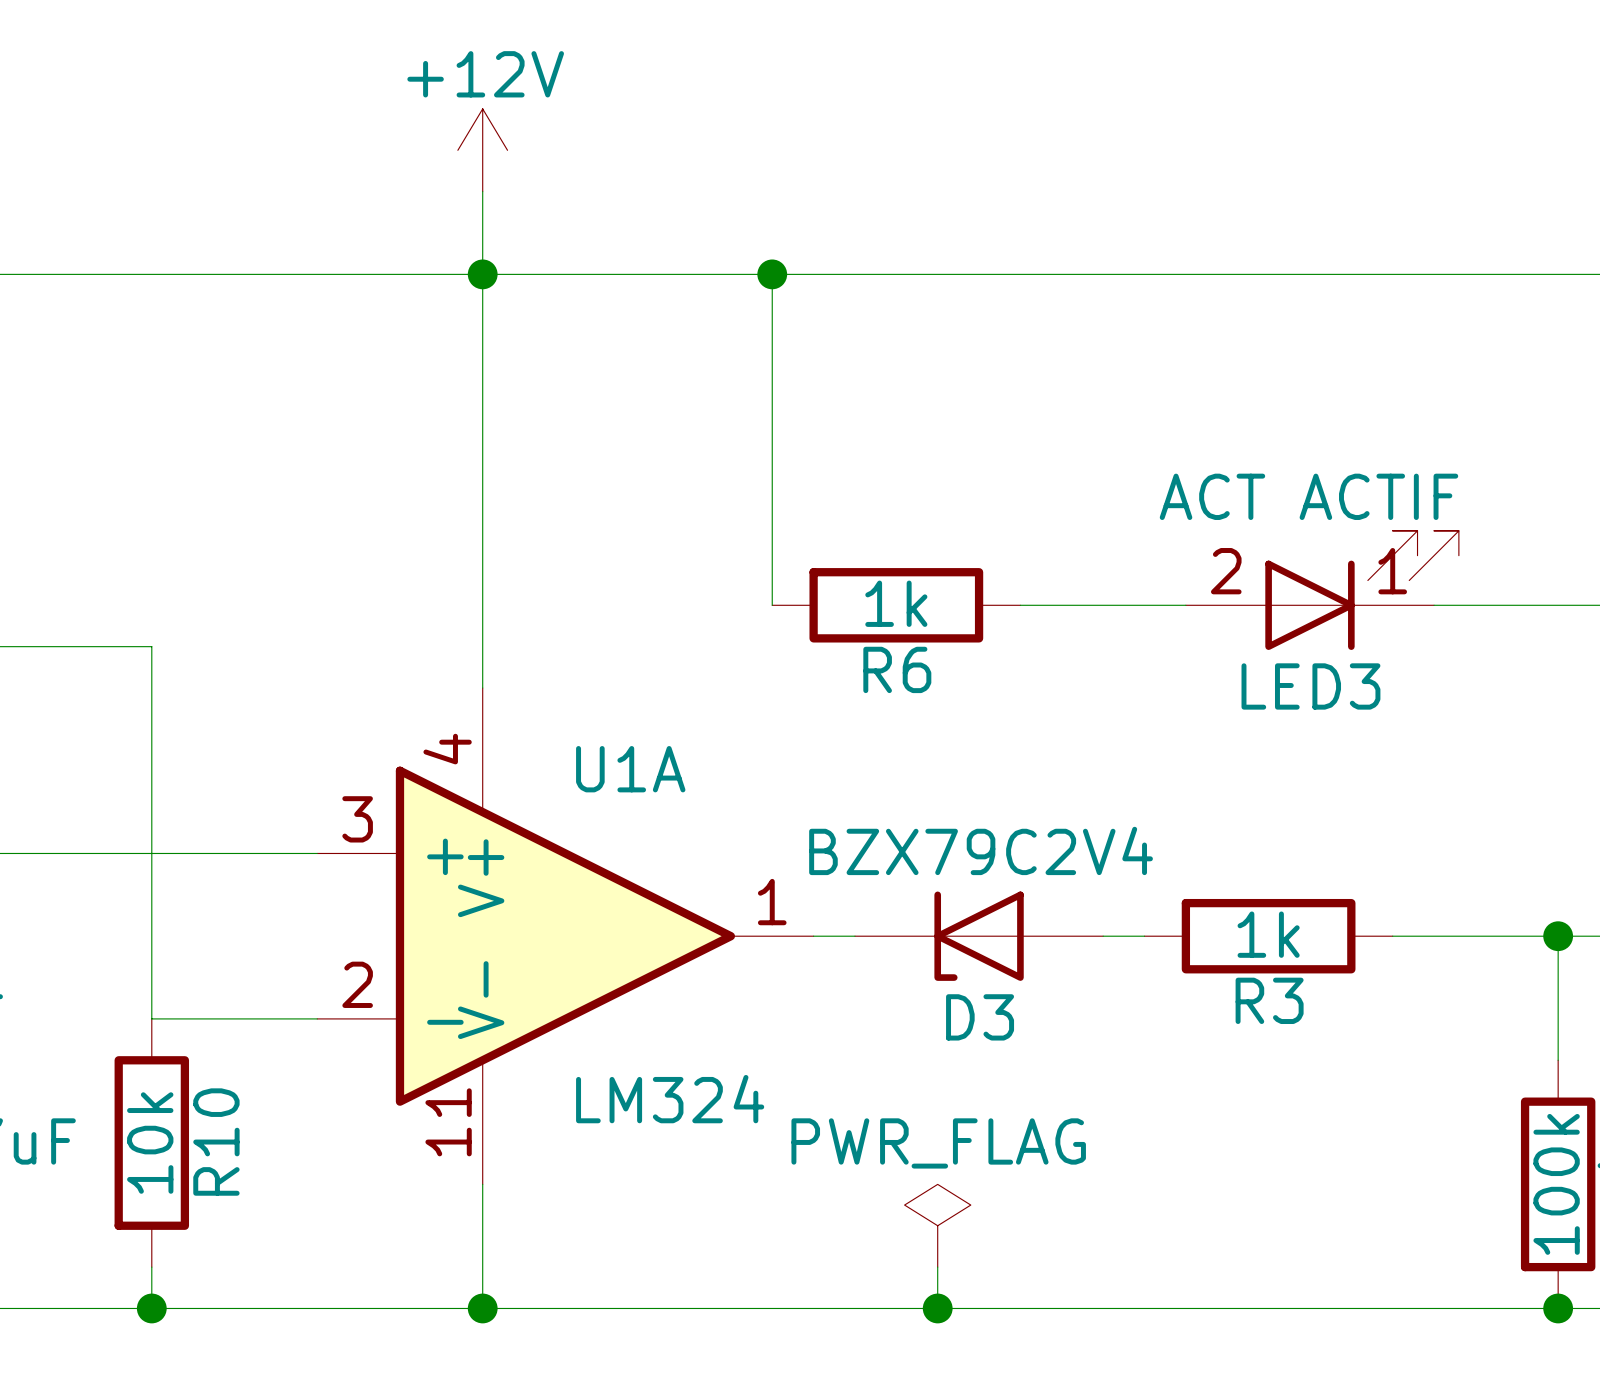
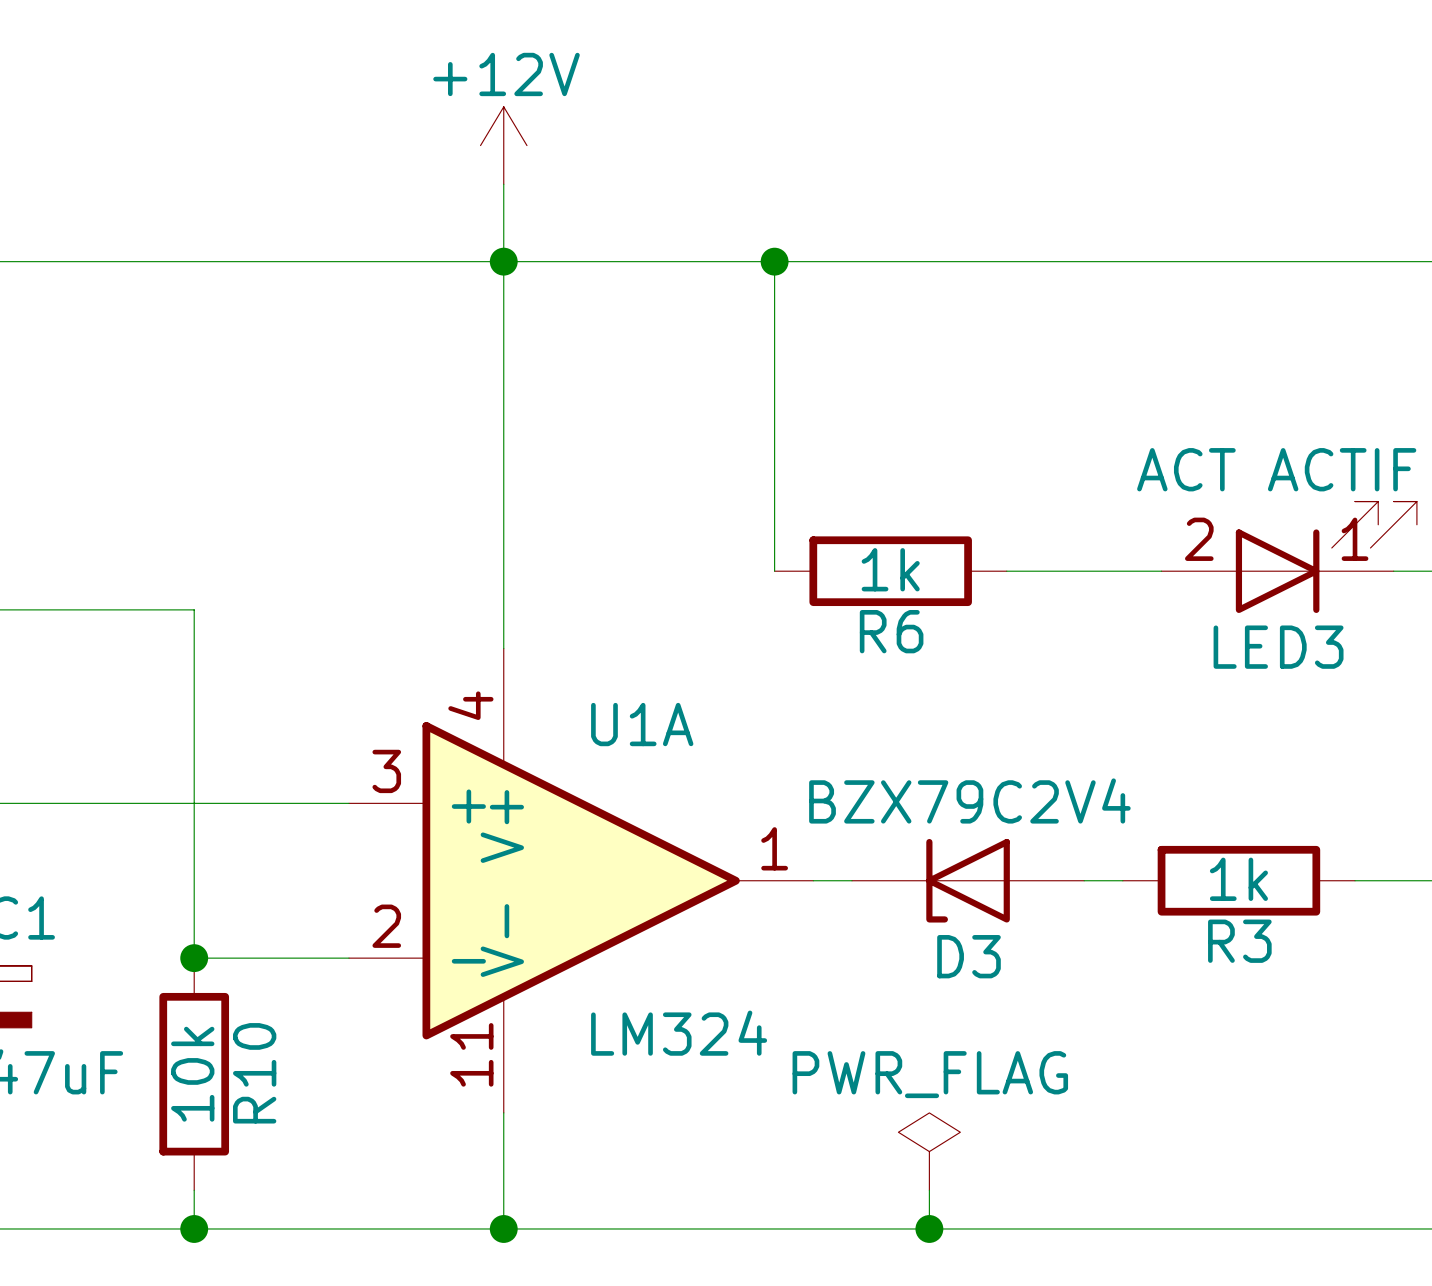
junction: none -> (194, 958)

